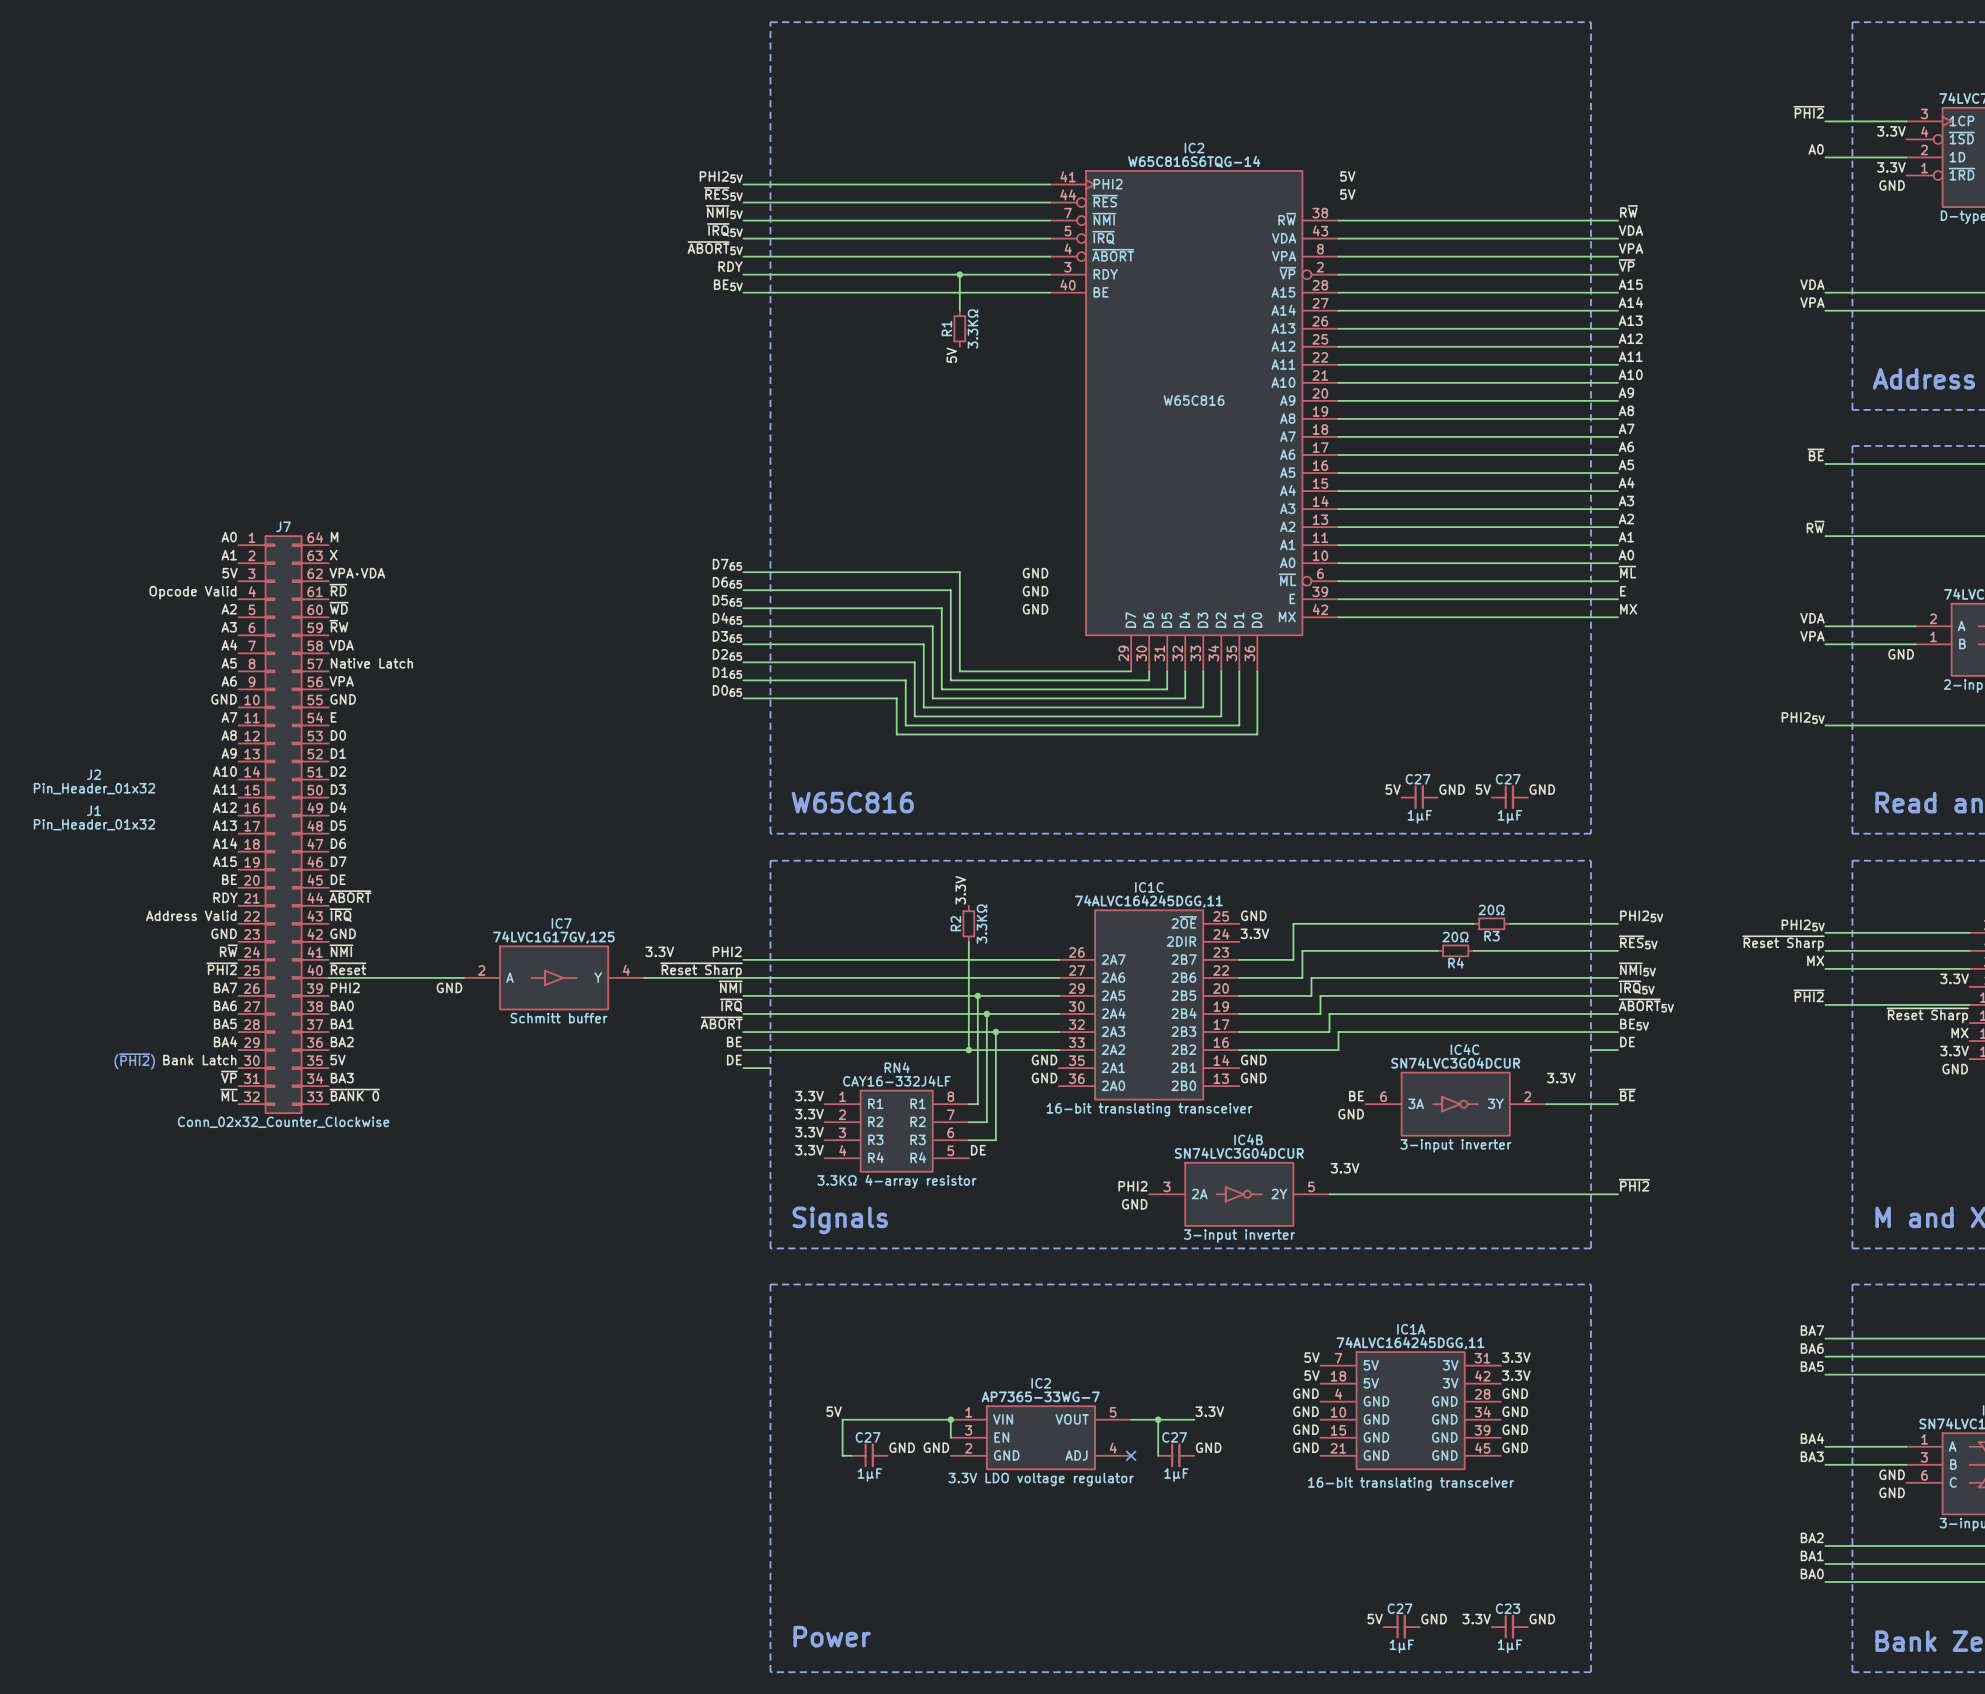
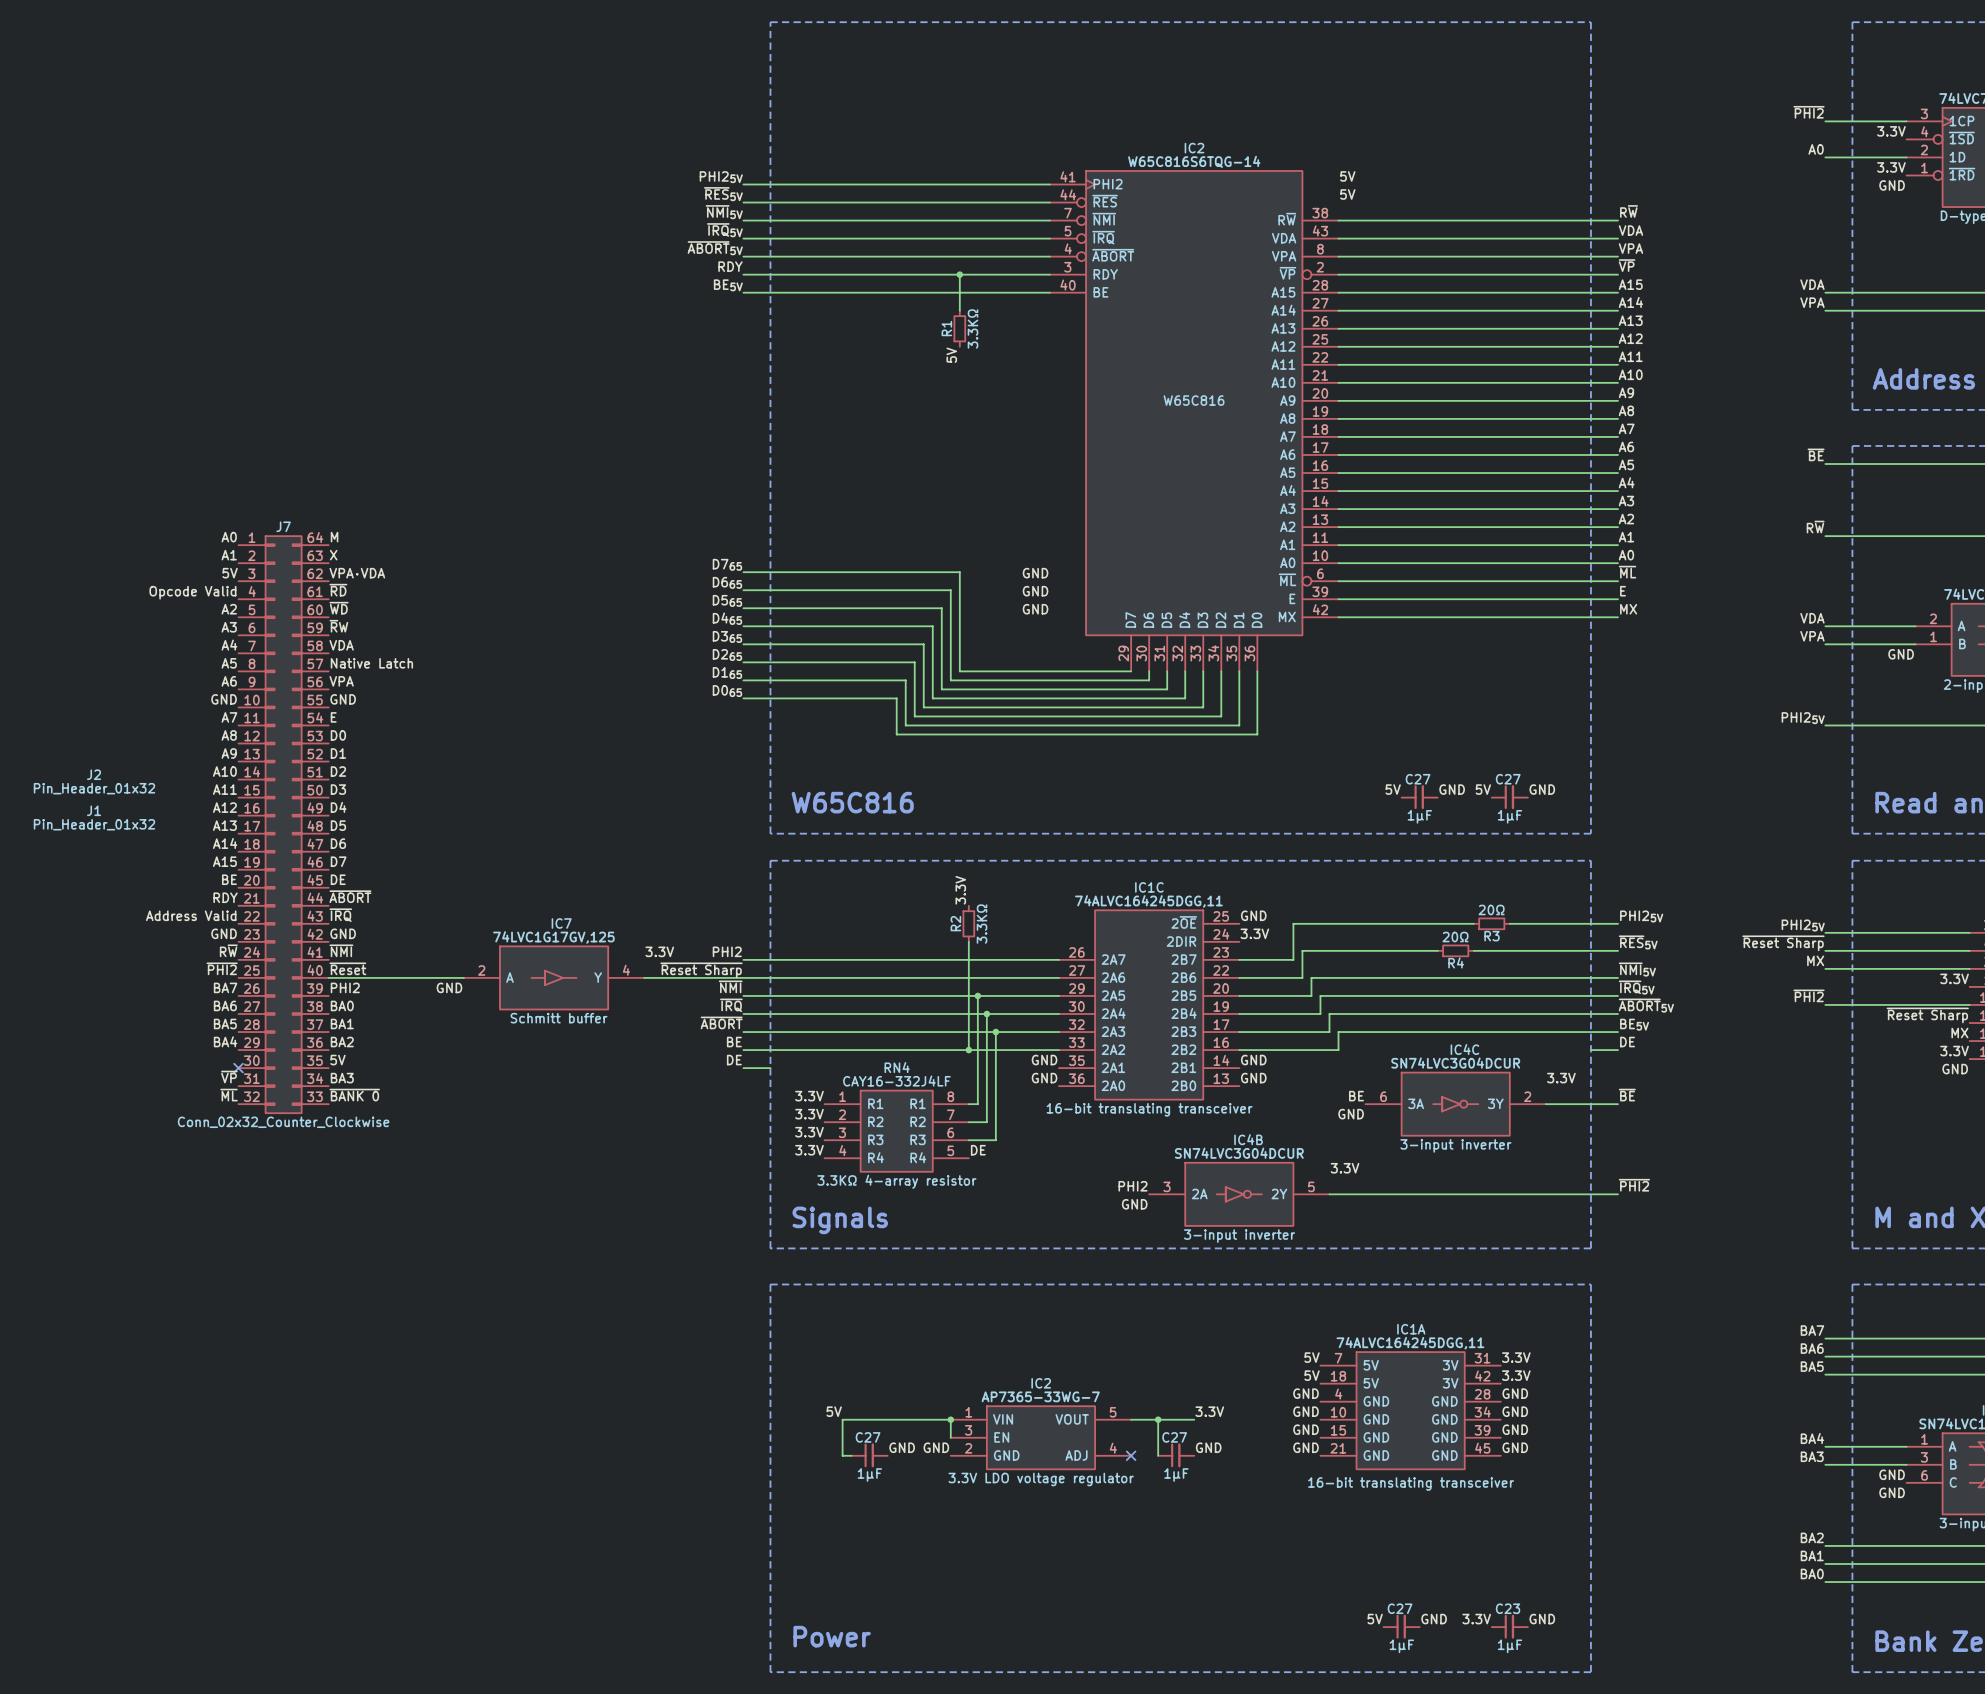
label: Bank Latch (199, 1060) -> none
text: (~{PHI2}) (134, 1061) -> none
no-connect mark: none -> (238, 1068)

